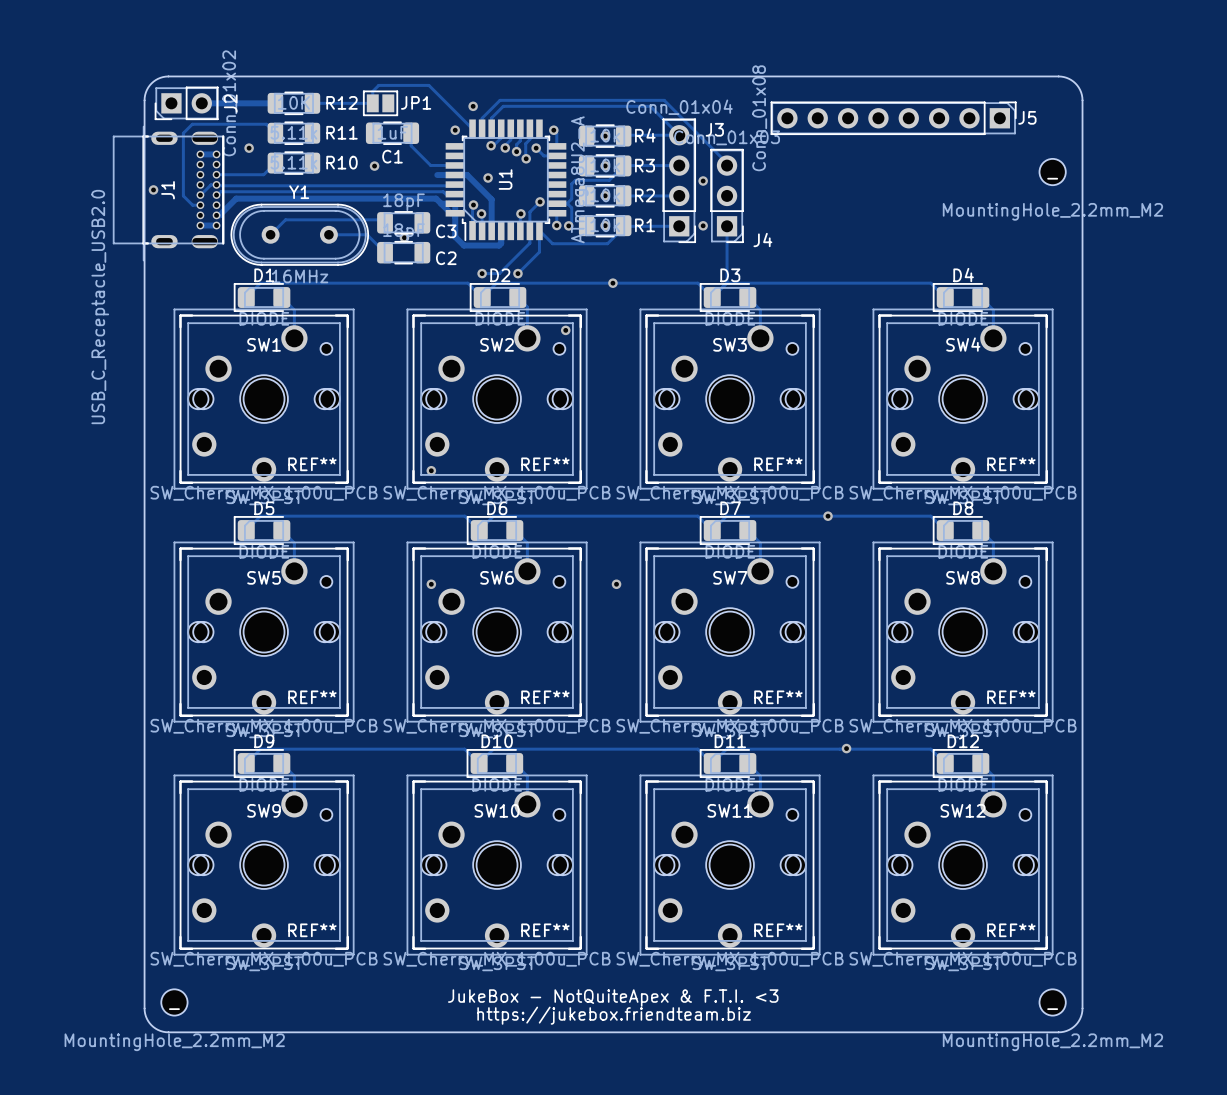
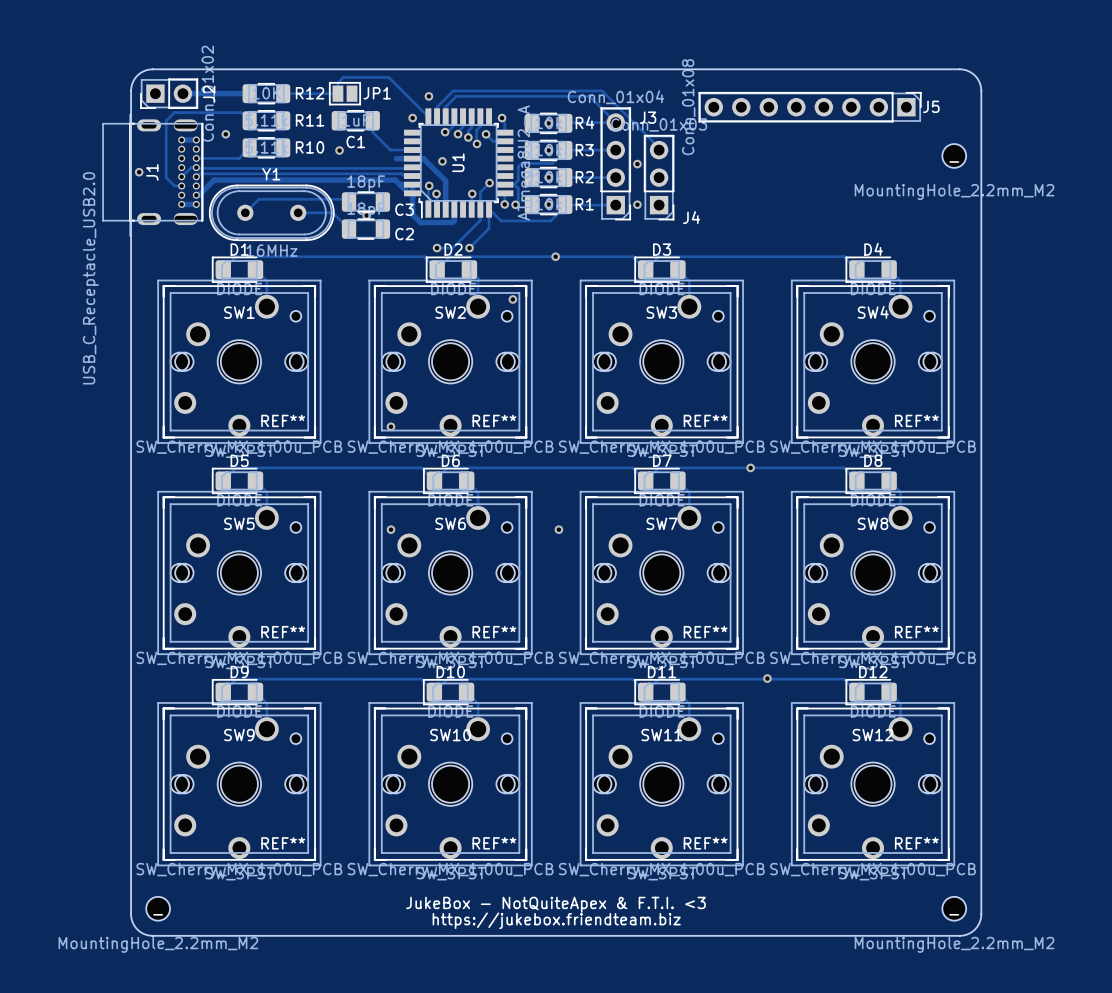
track: (727, 226) (726, 283) -> none

